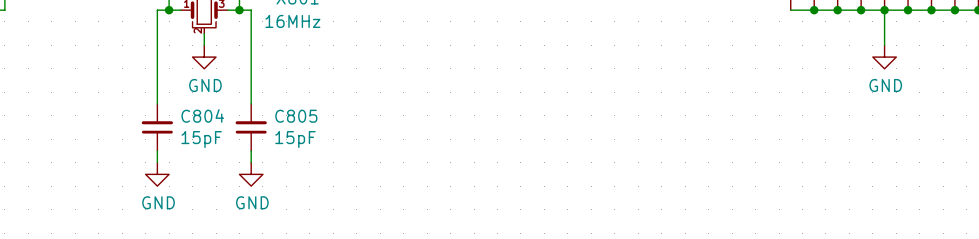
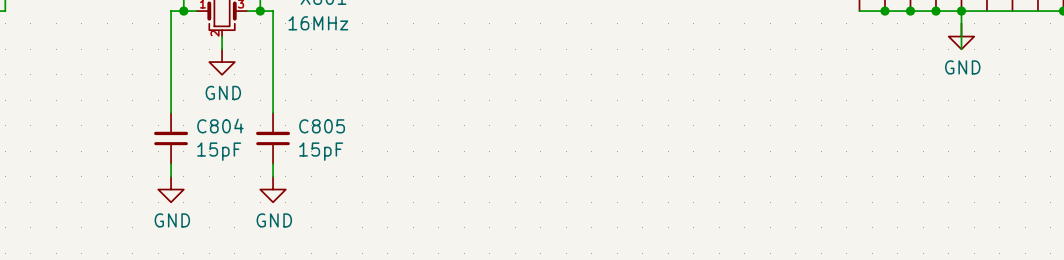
junction: (908, 10) -> none
junction: (931, 10) -> none
junction: (954, 10) -> none
power symbol position: GND (884, 57) -> GND (961, 36)

